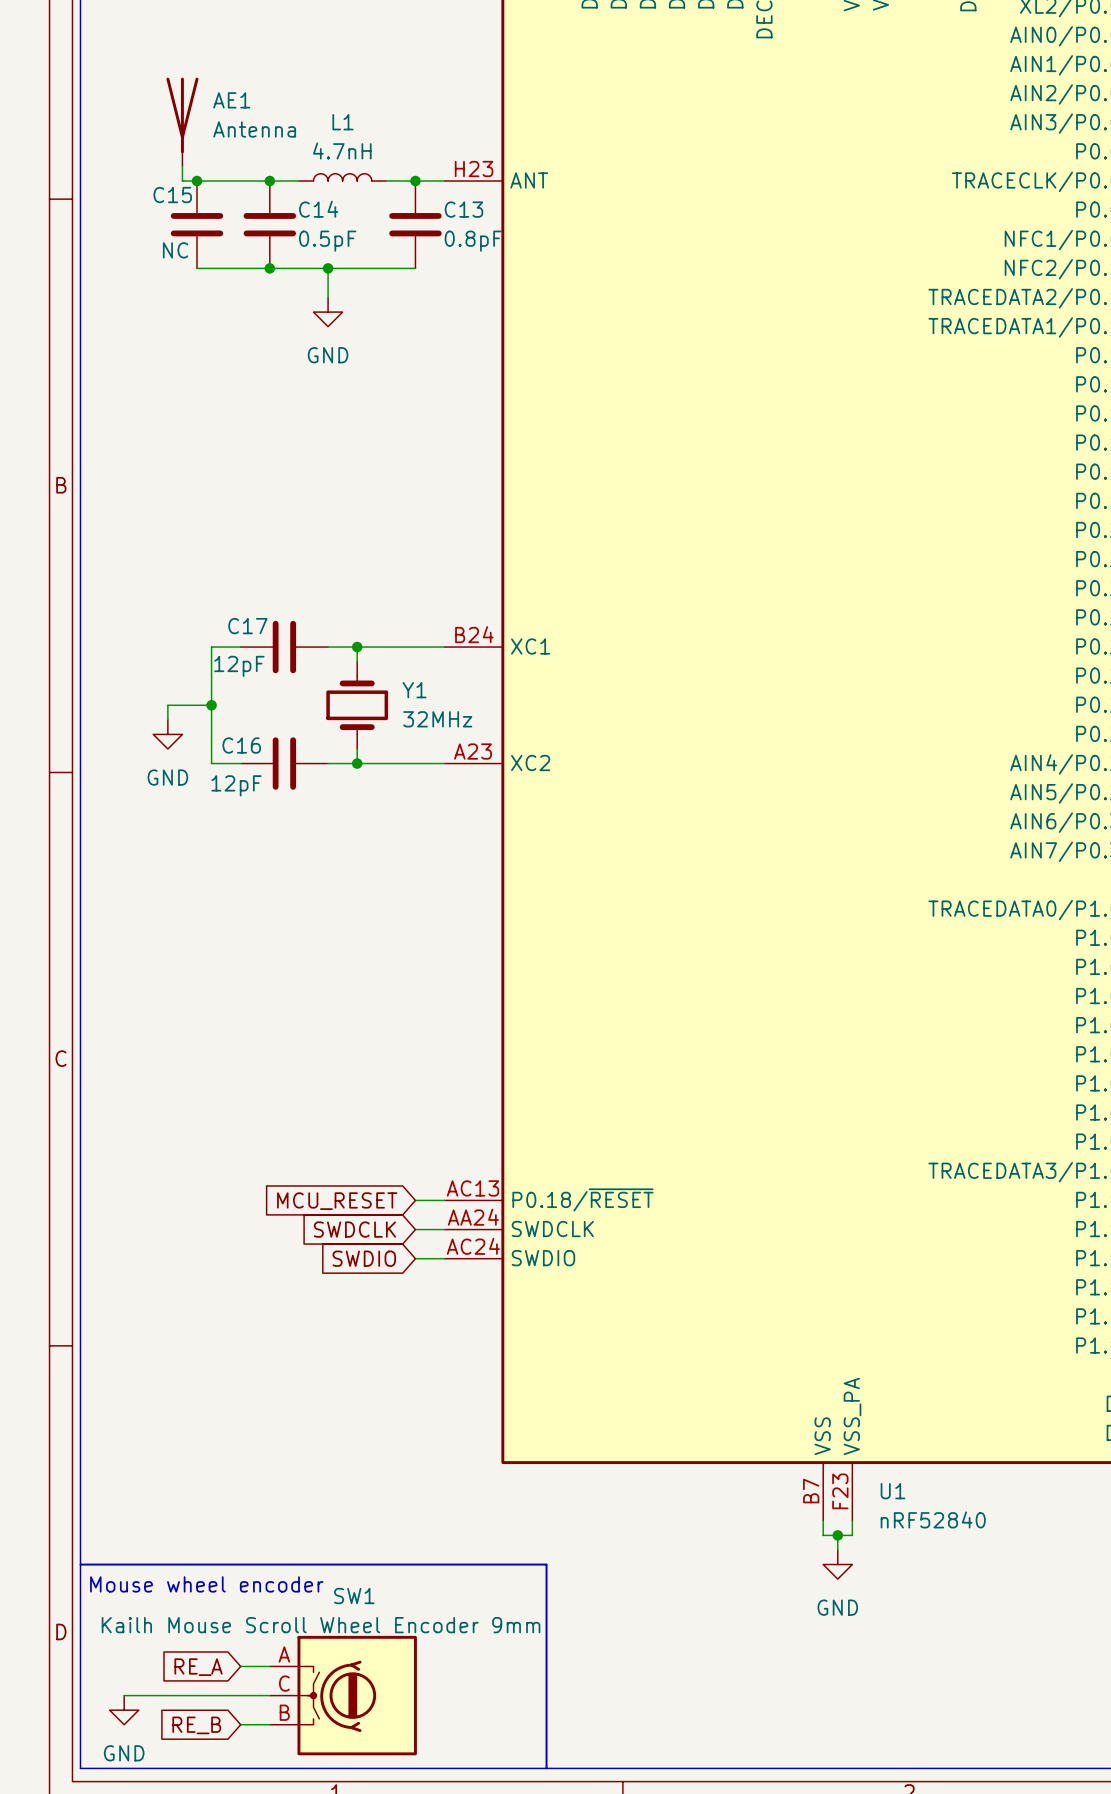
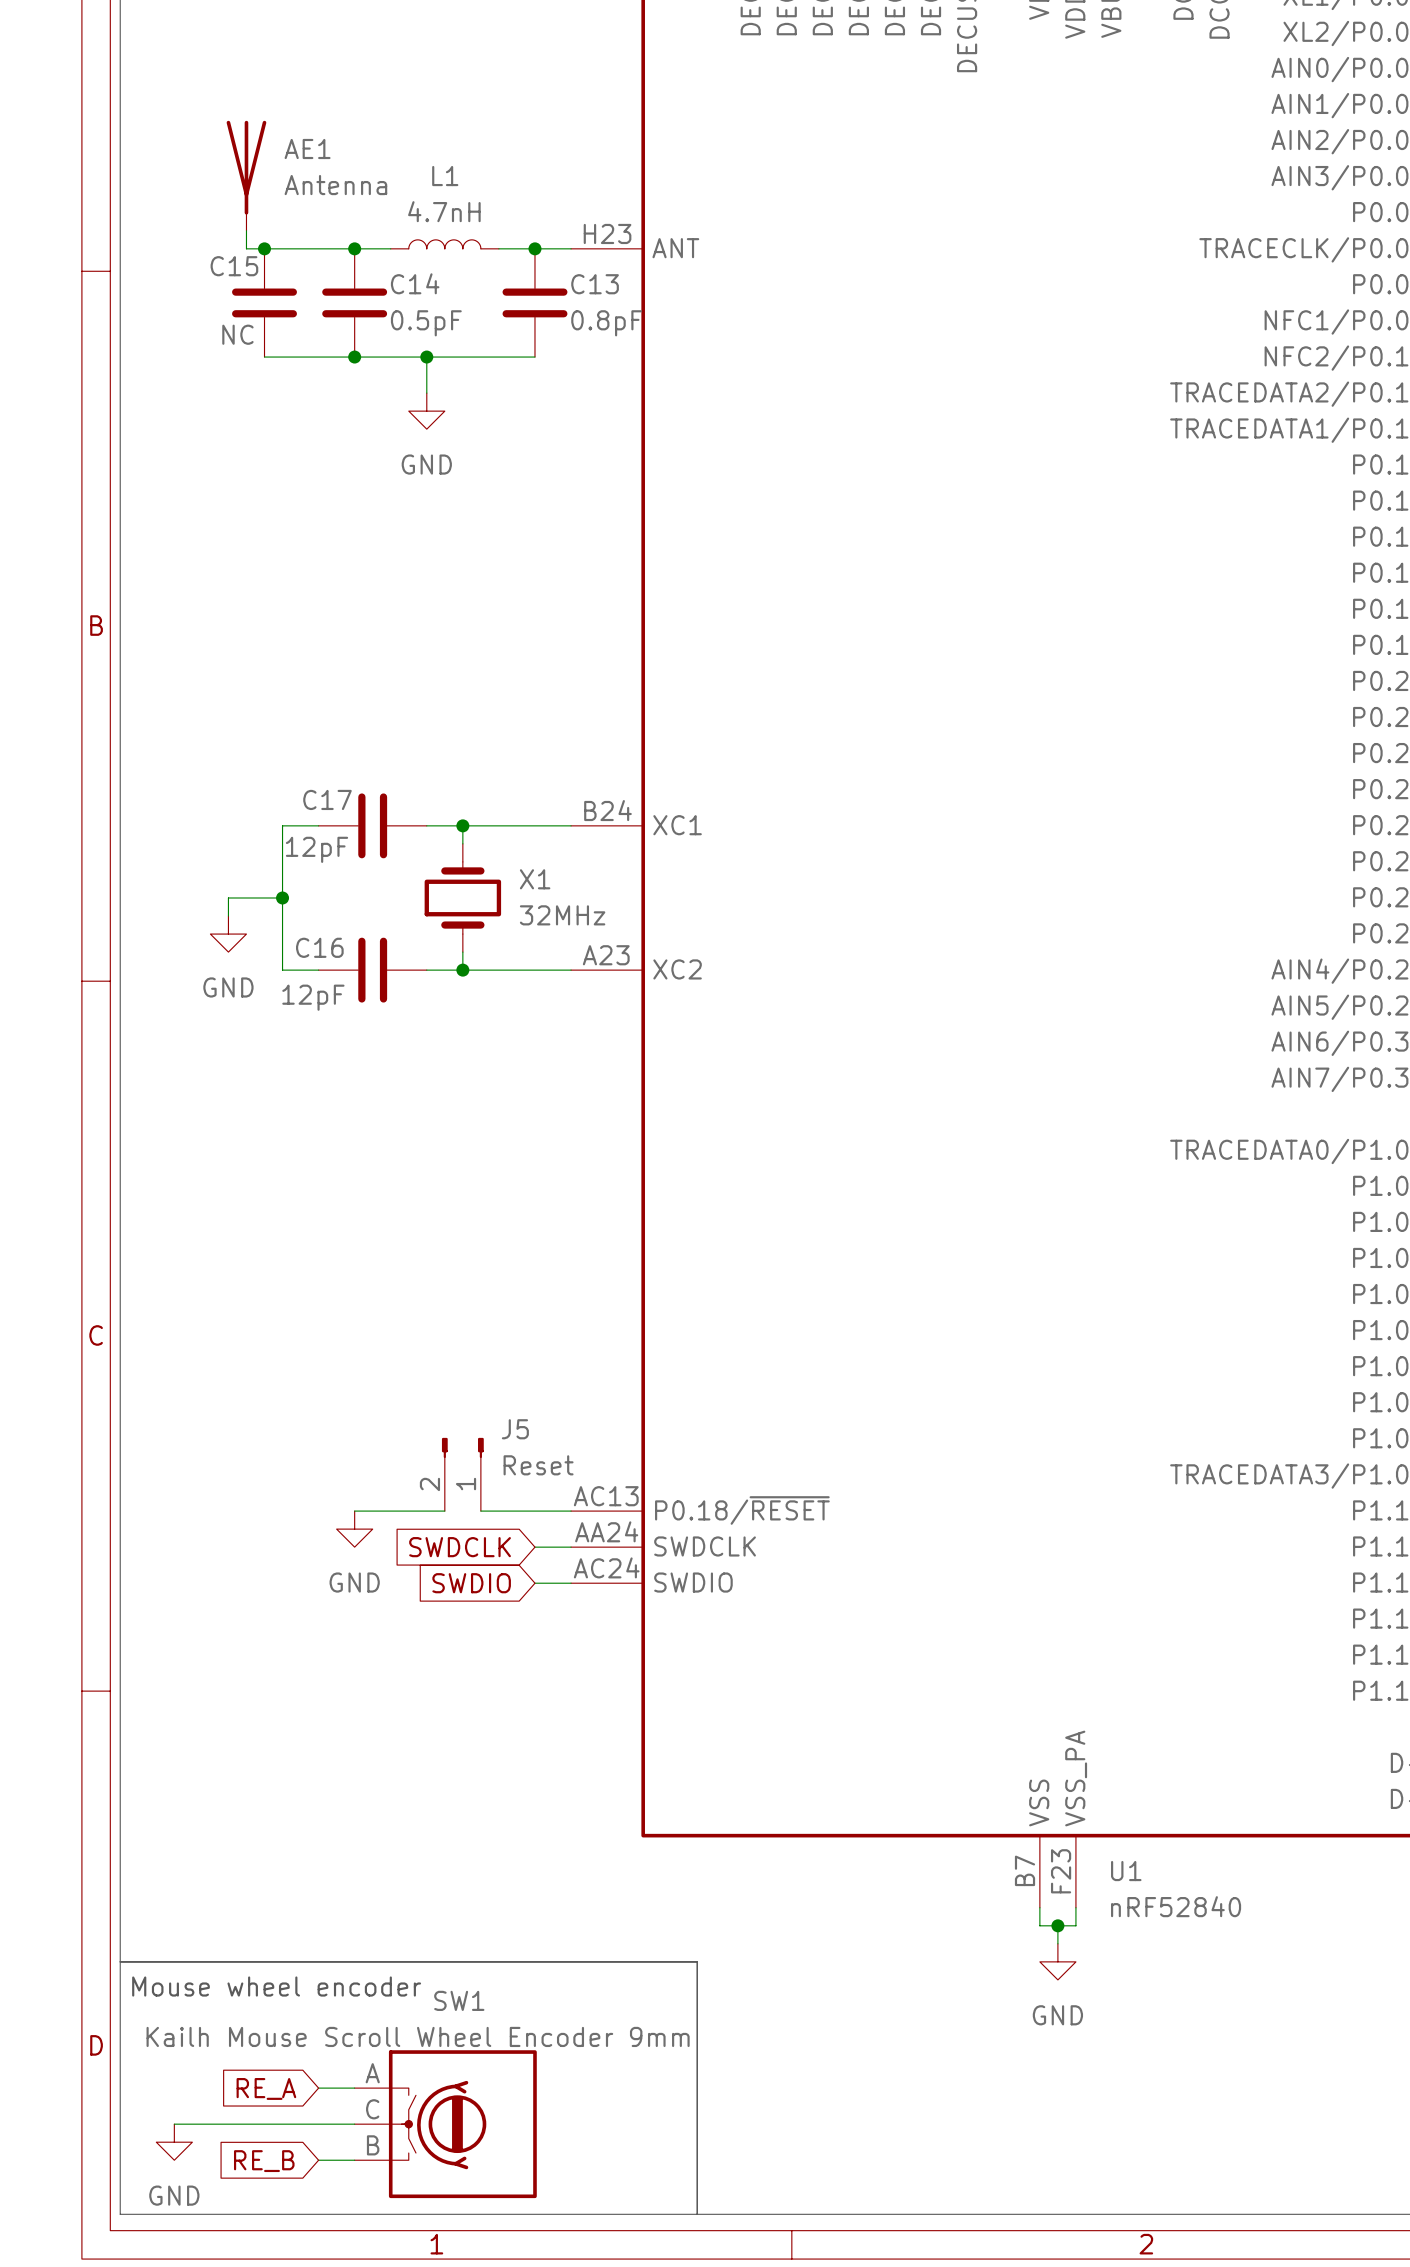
Y1 name: Y1 (414, 690) -> X1 (535, 879)
J5: none -> Reset (462, 1474)
wire: none -> (354, 1511) (444, 1511)
wire: none -> (480, 1511) (534, 1511)
global label: MCU_RESET (337, 1201) -> none
power symbol: none -> GND (354, 1529)

